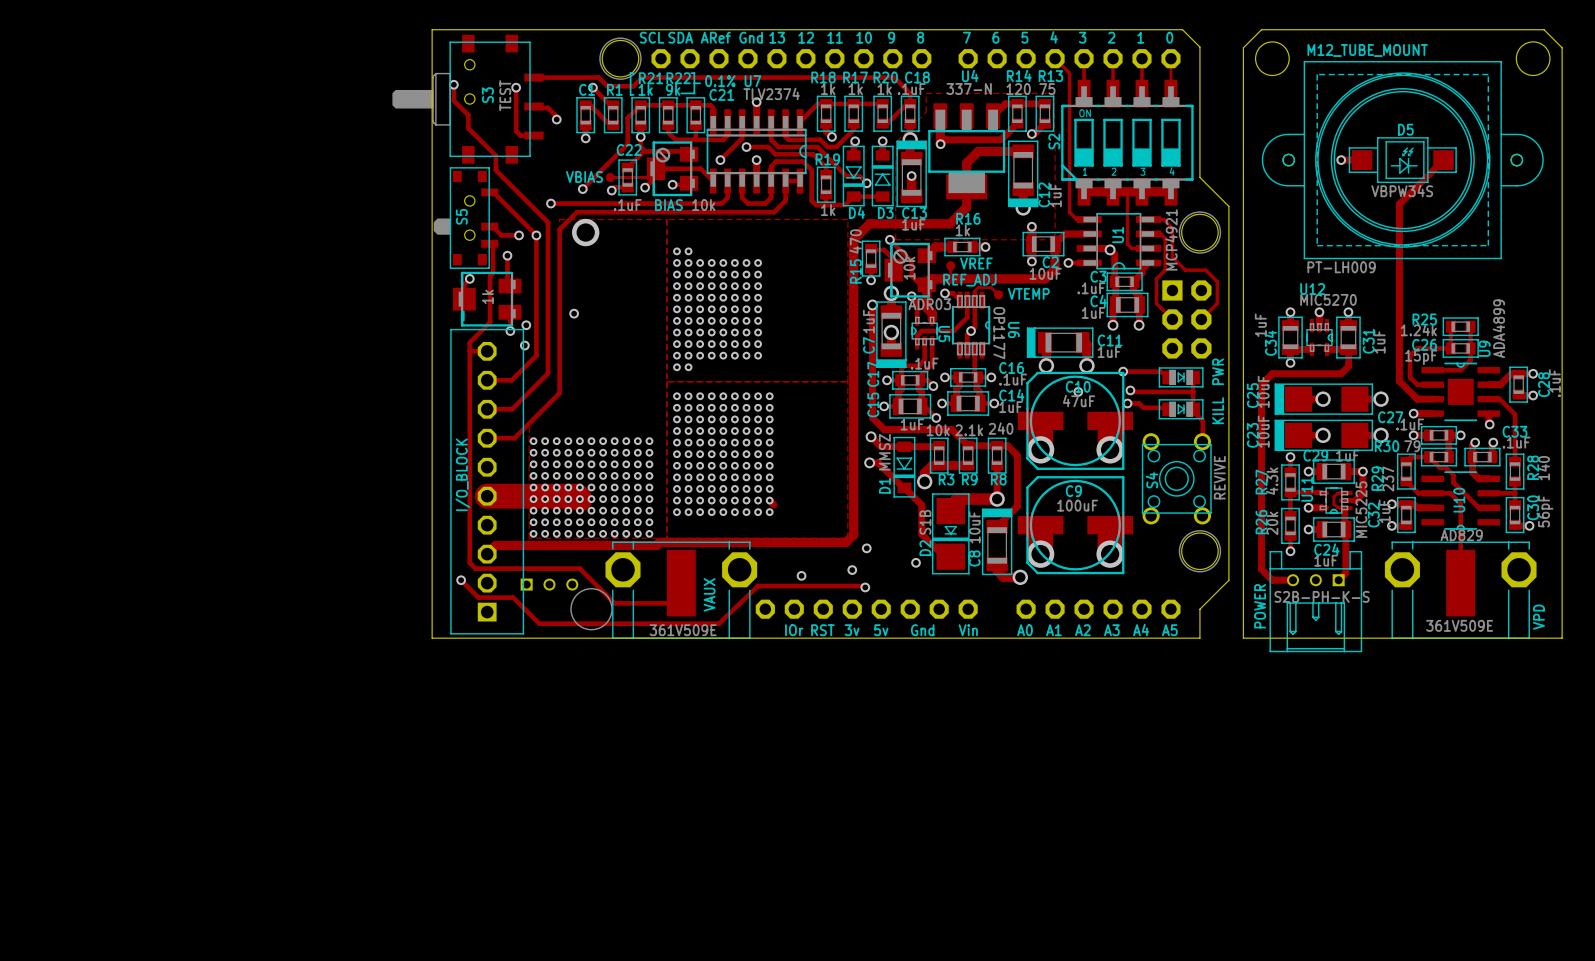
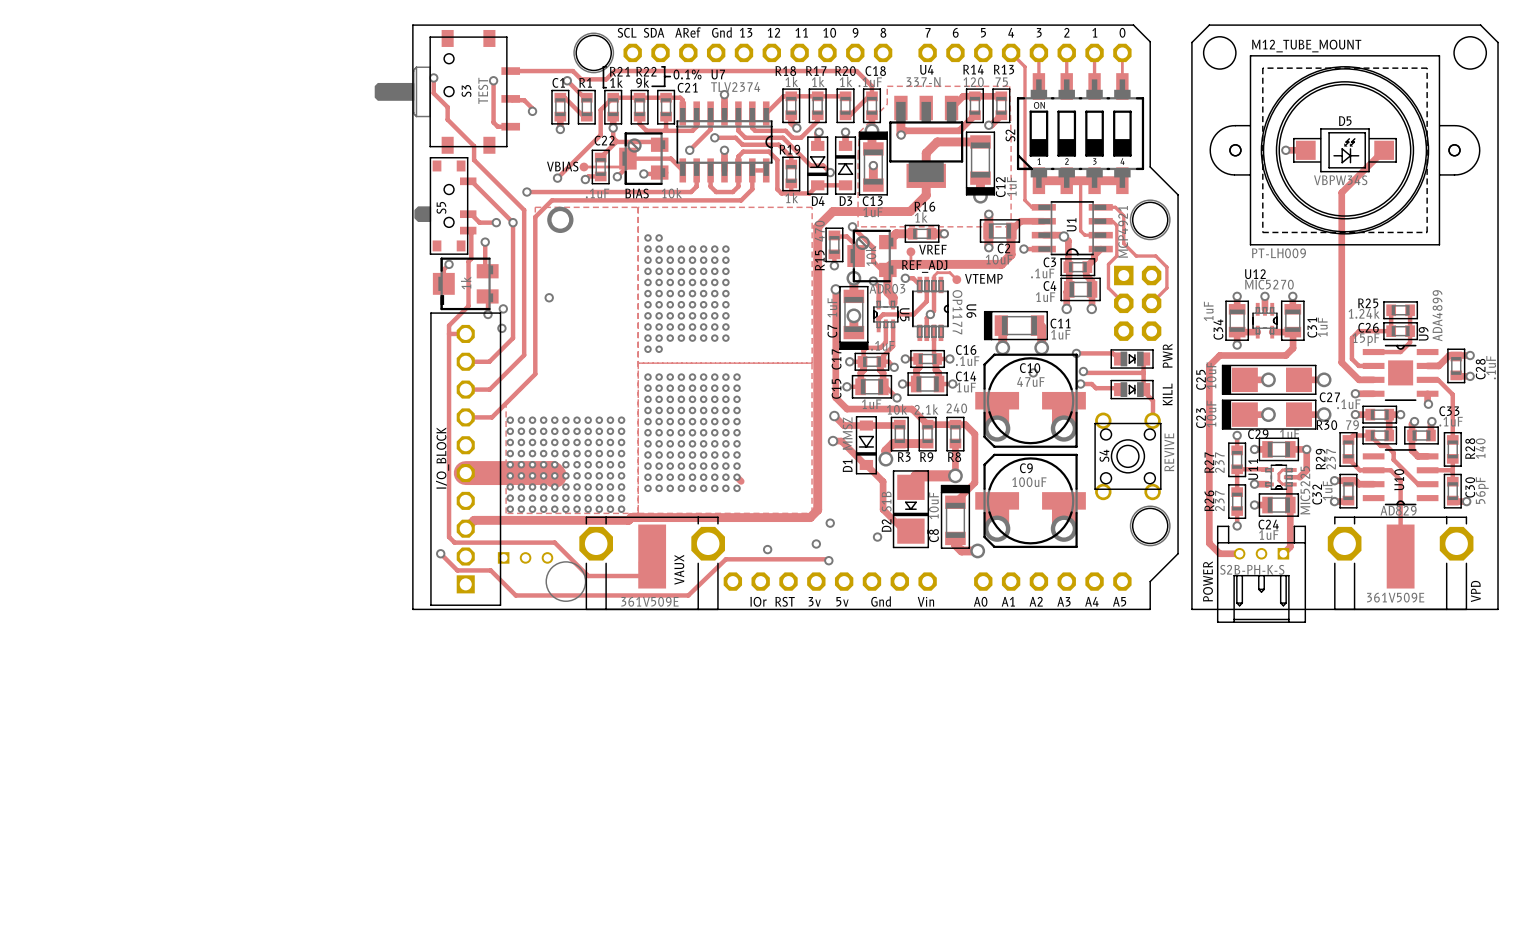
R27 value: 4.3k (1272, 481) -> 237 (1219, 462)
R26 value: 20k (1272, 523) -> 237 (1219, 500)

